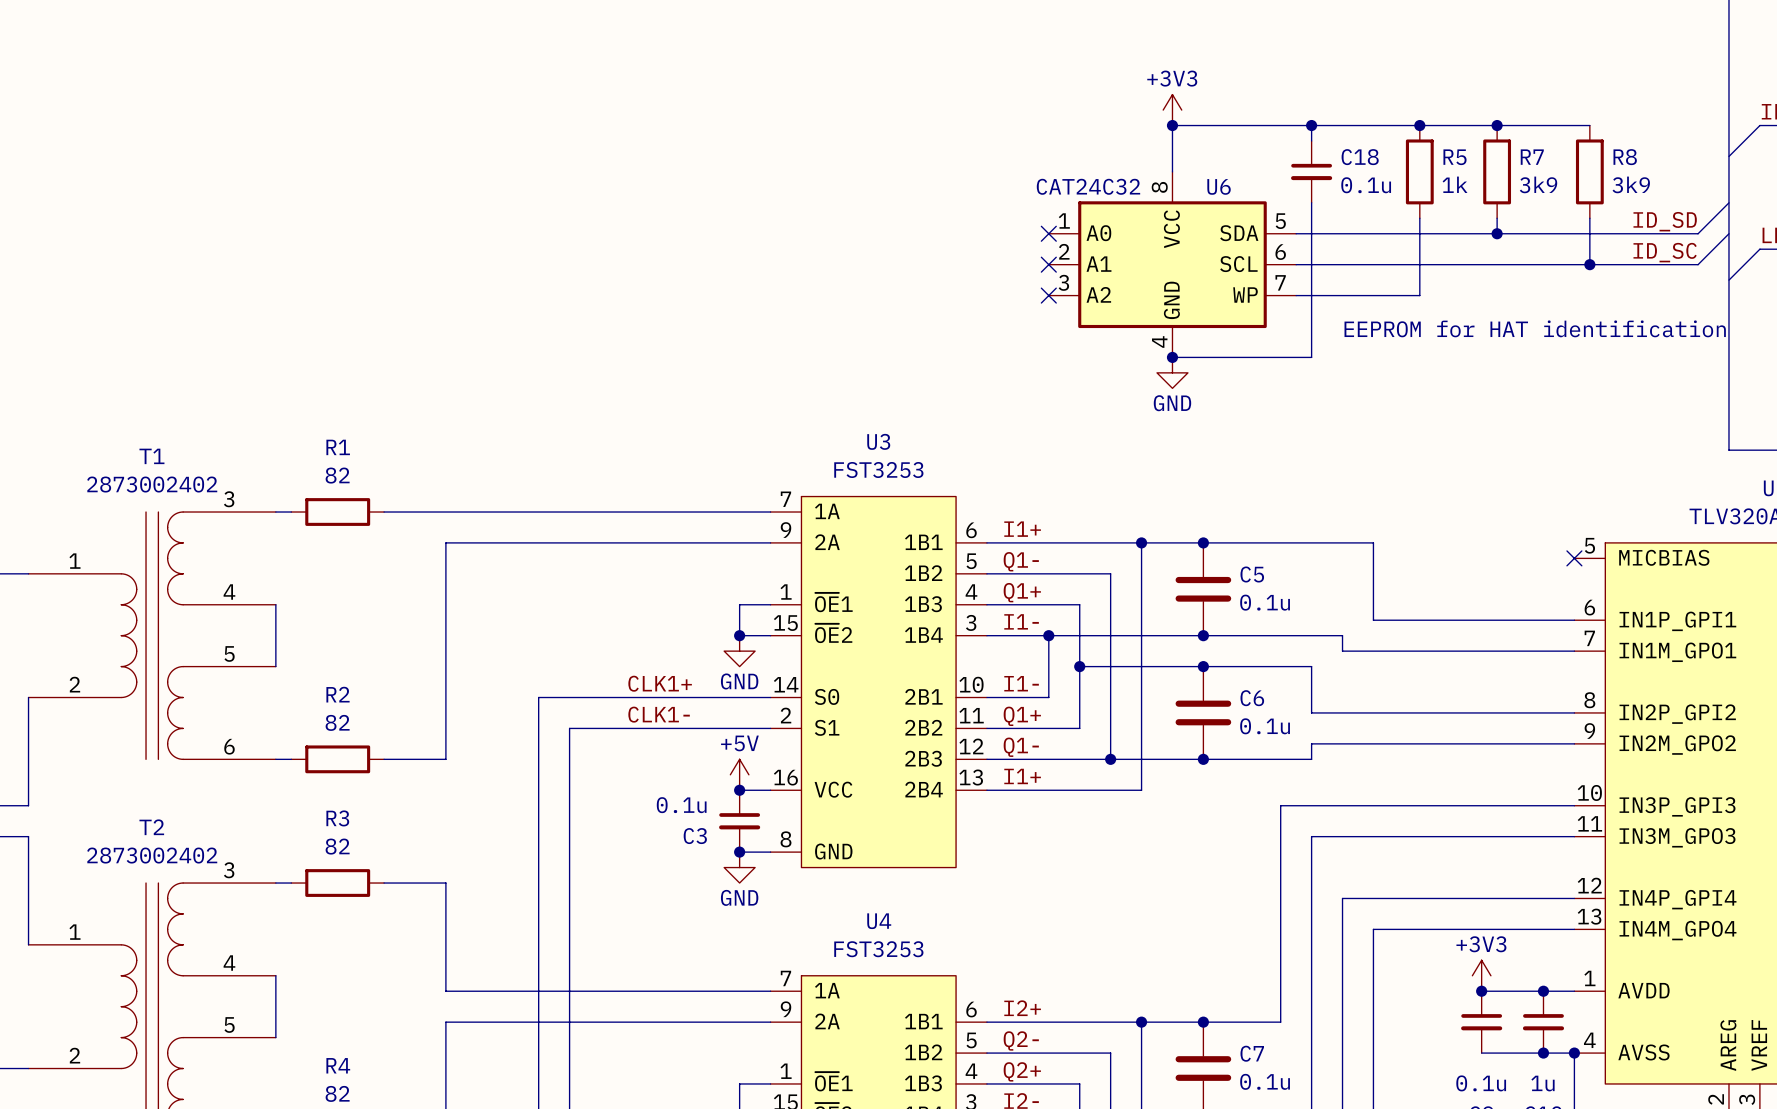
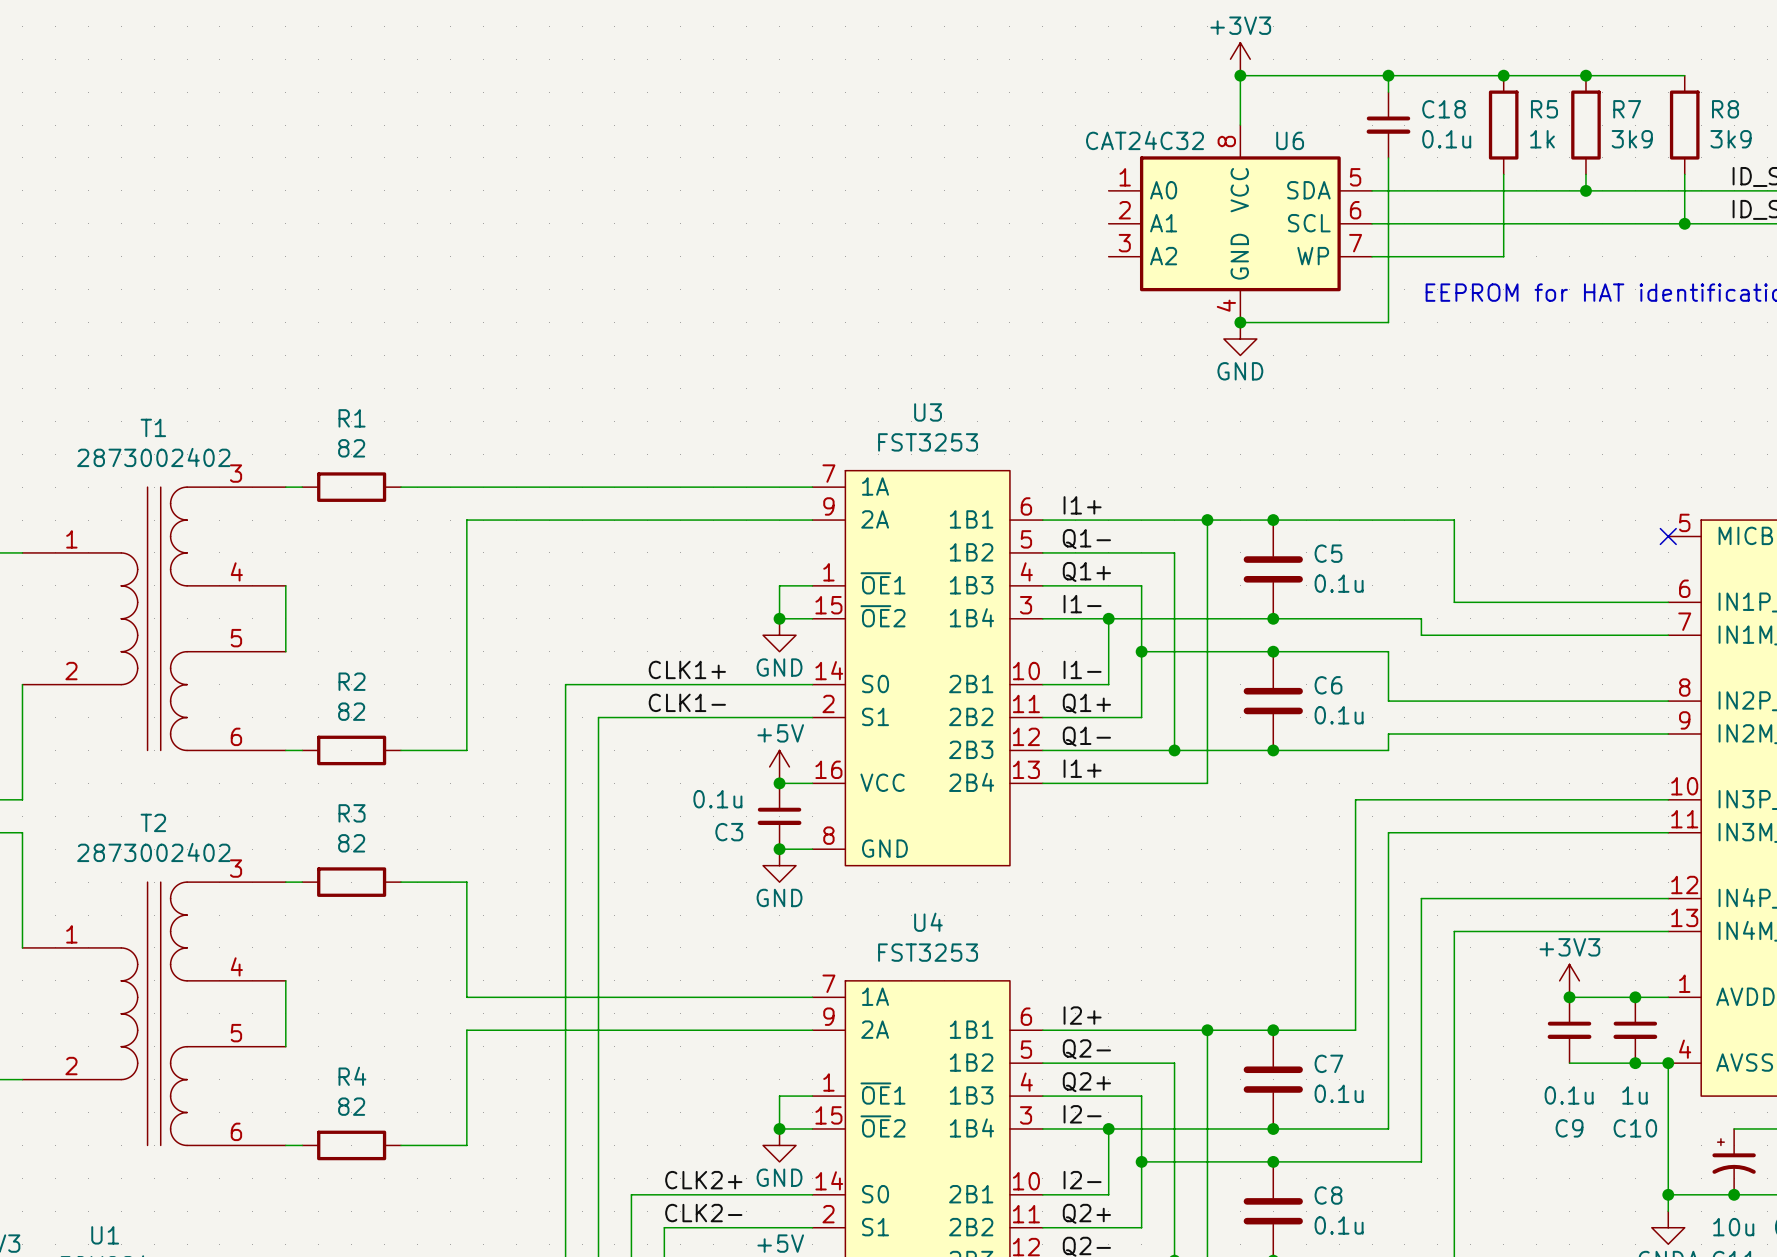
no-connect mark: (1048, 233) -> none
no-connect mark: (1048, 264) -> none
no-connect mark: (1048, 295) -> none

